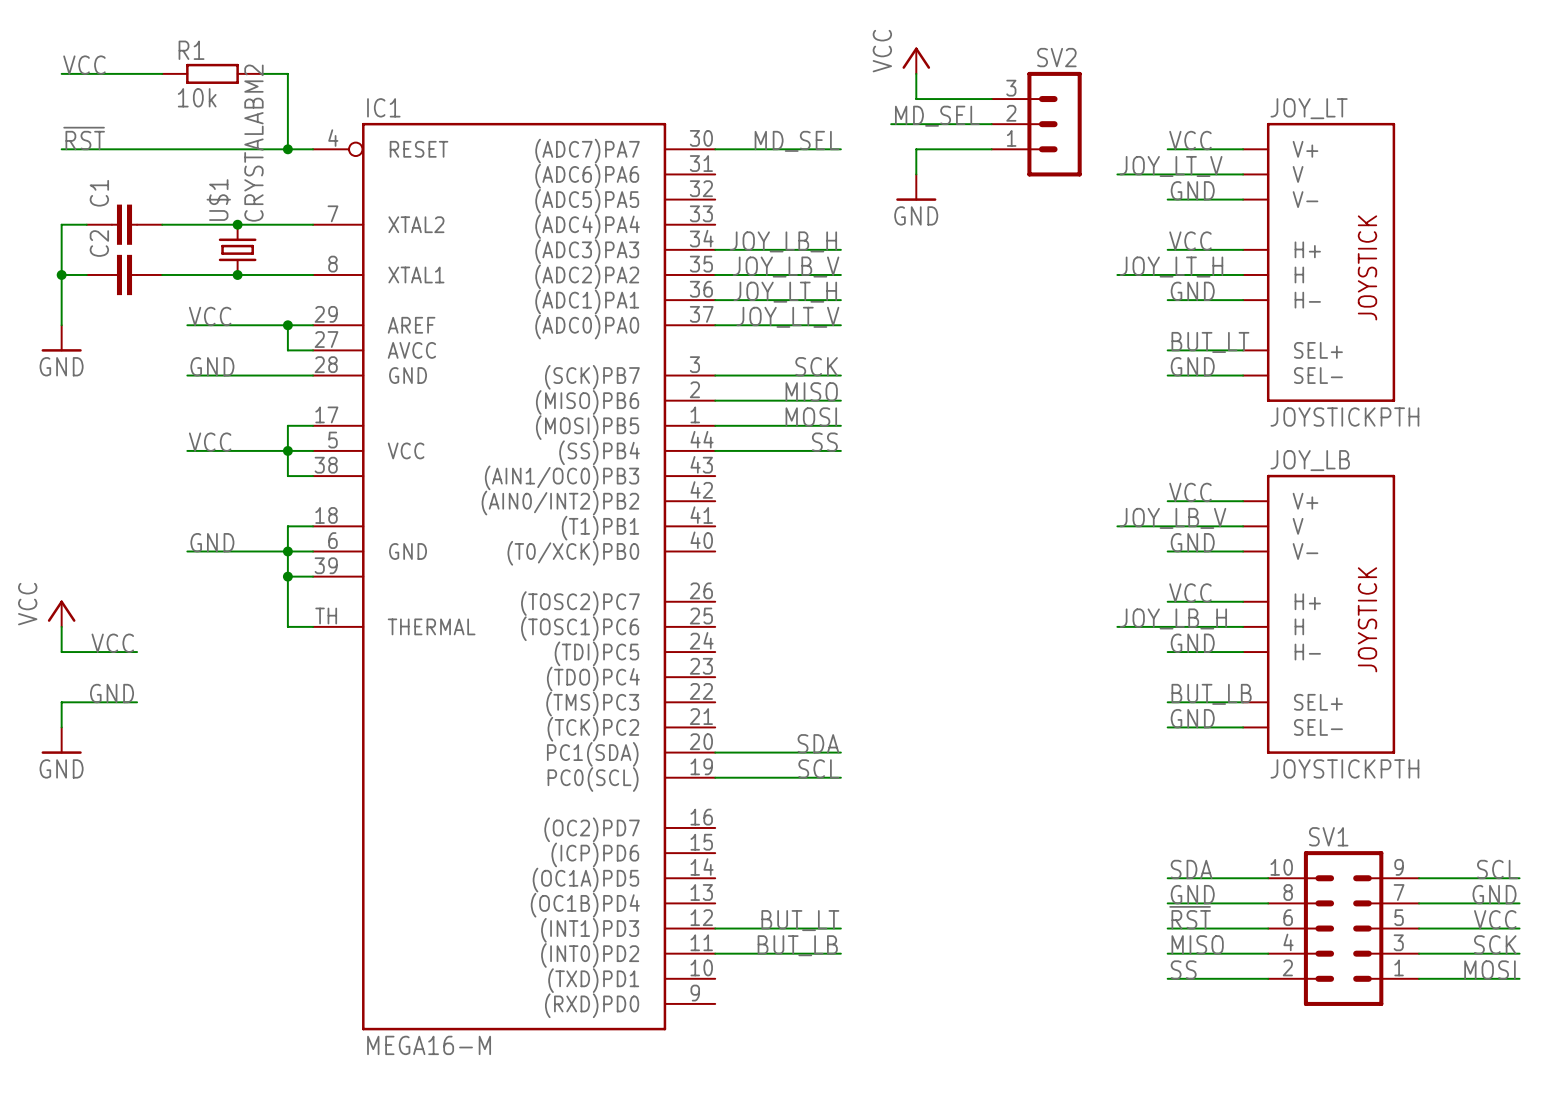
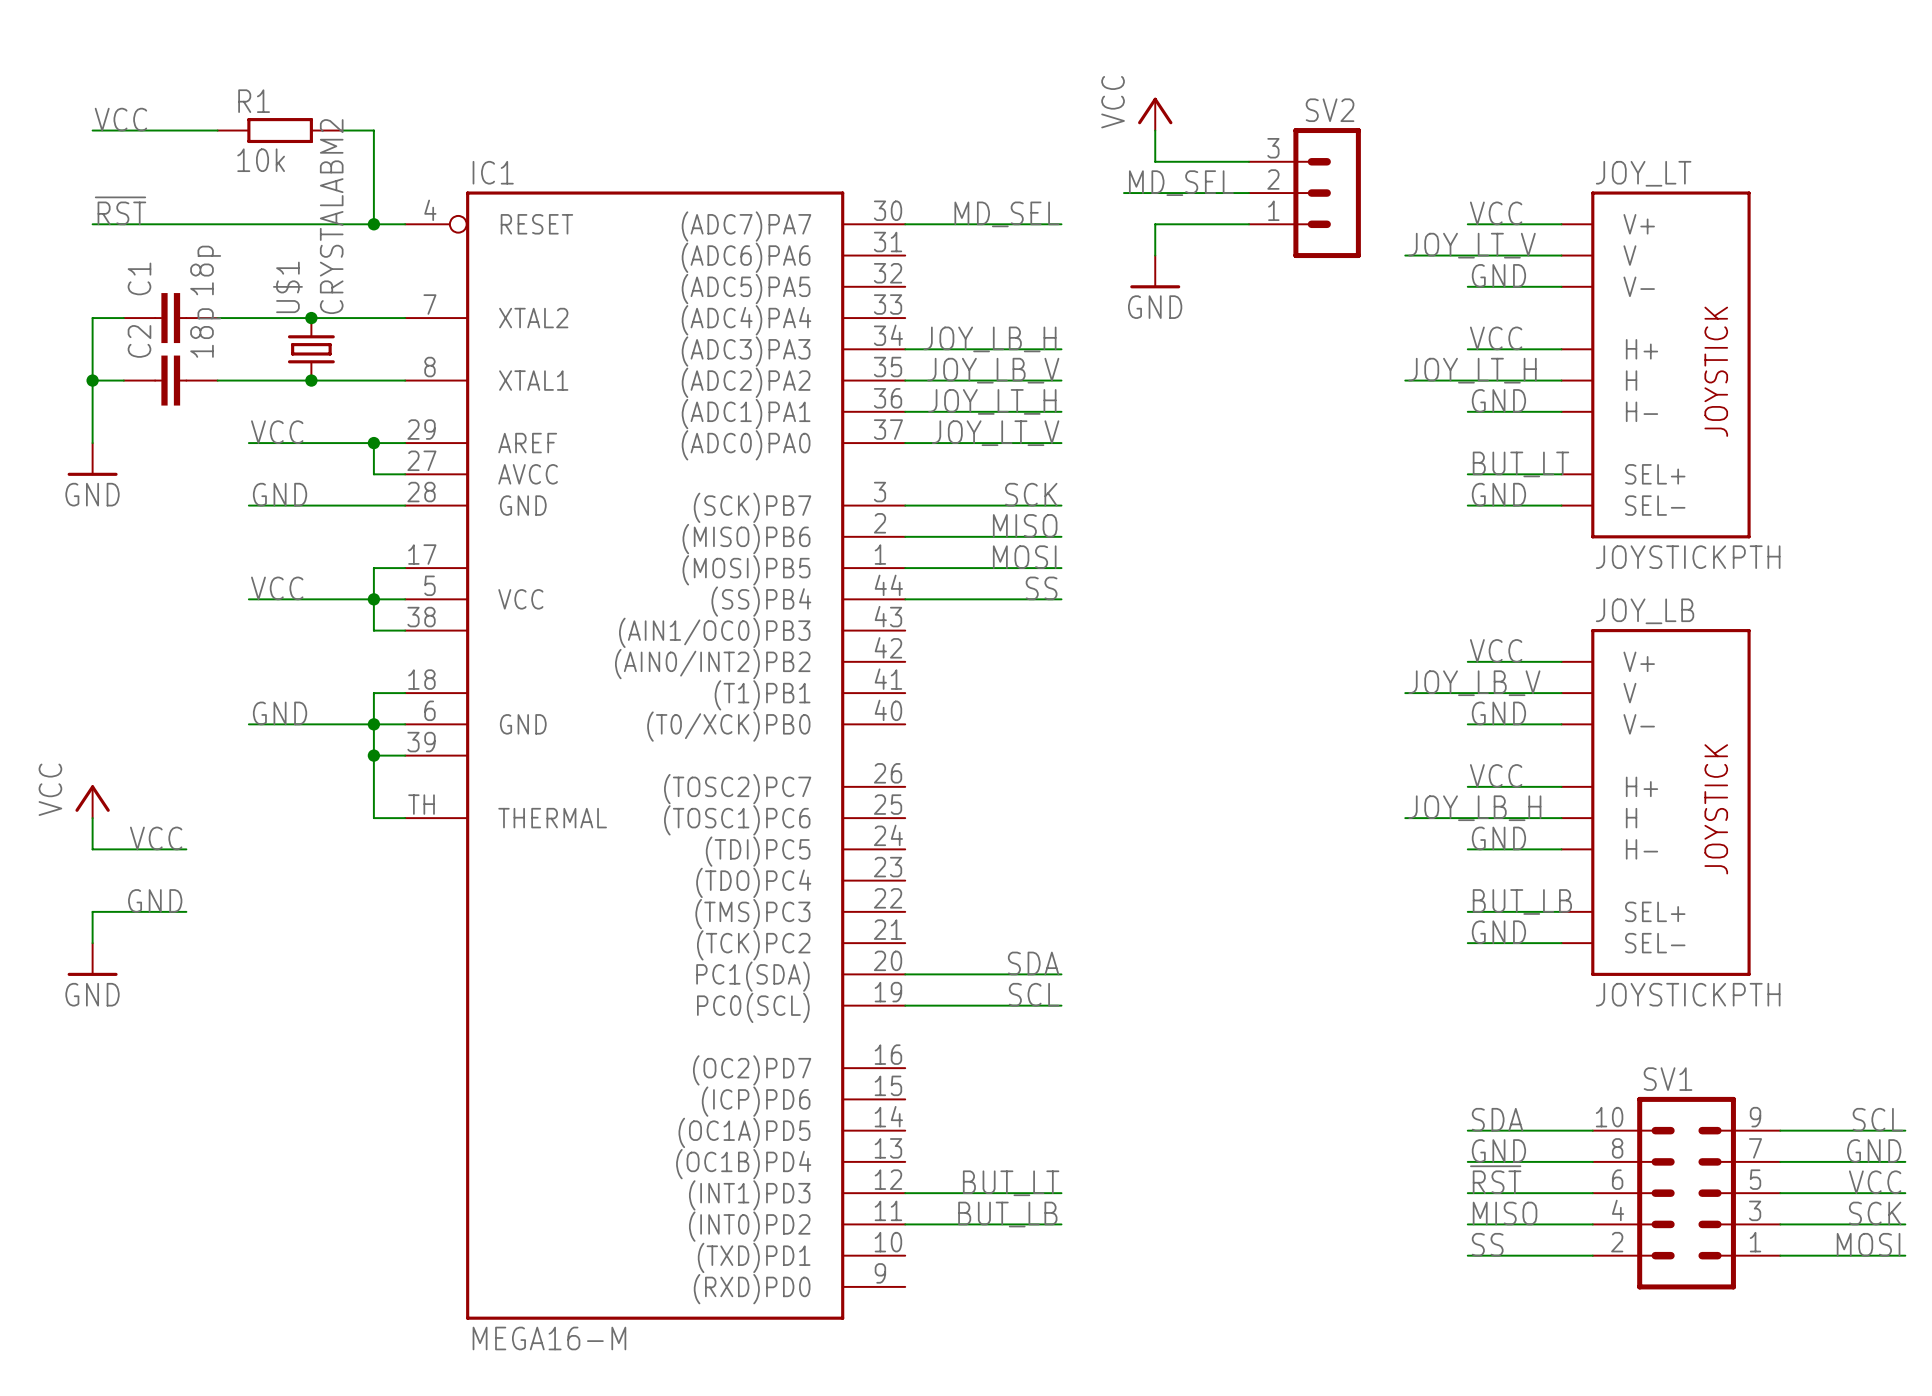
C1 value: none -> 18p (205, 270)
C2 value: none -> 18p (205, 333)

